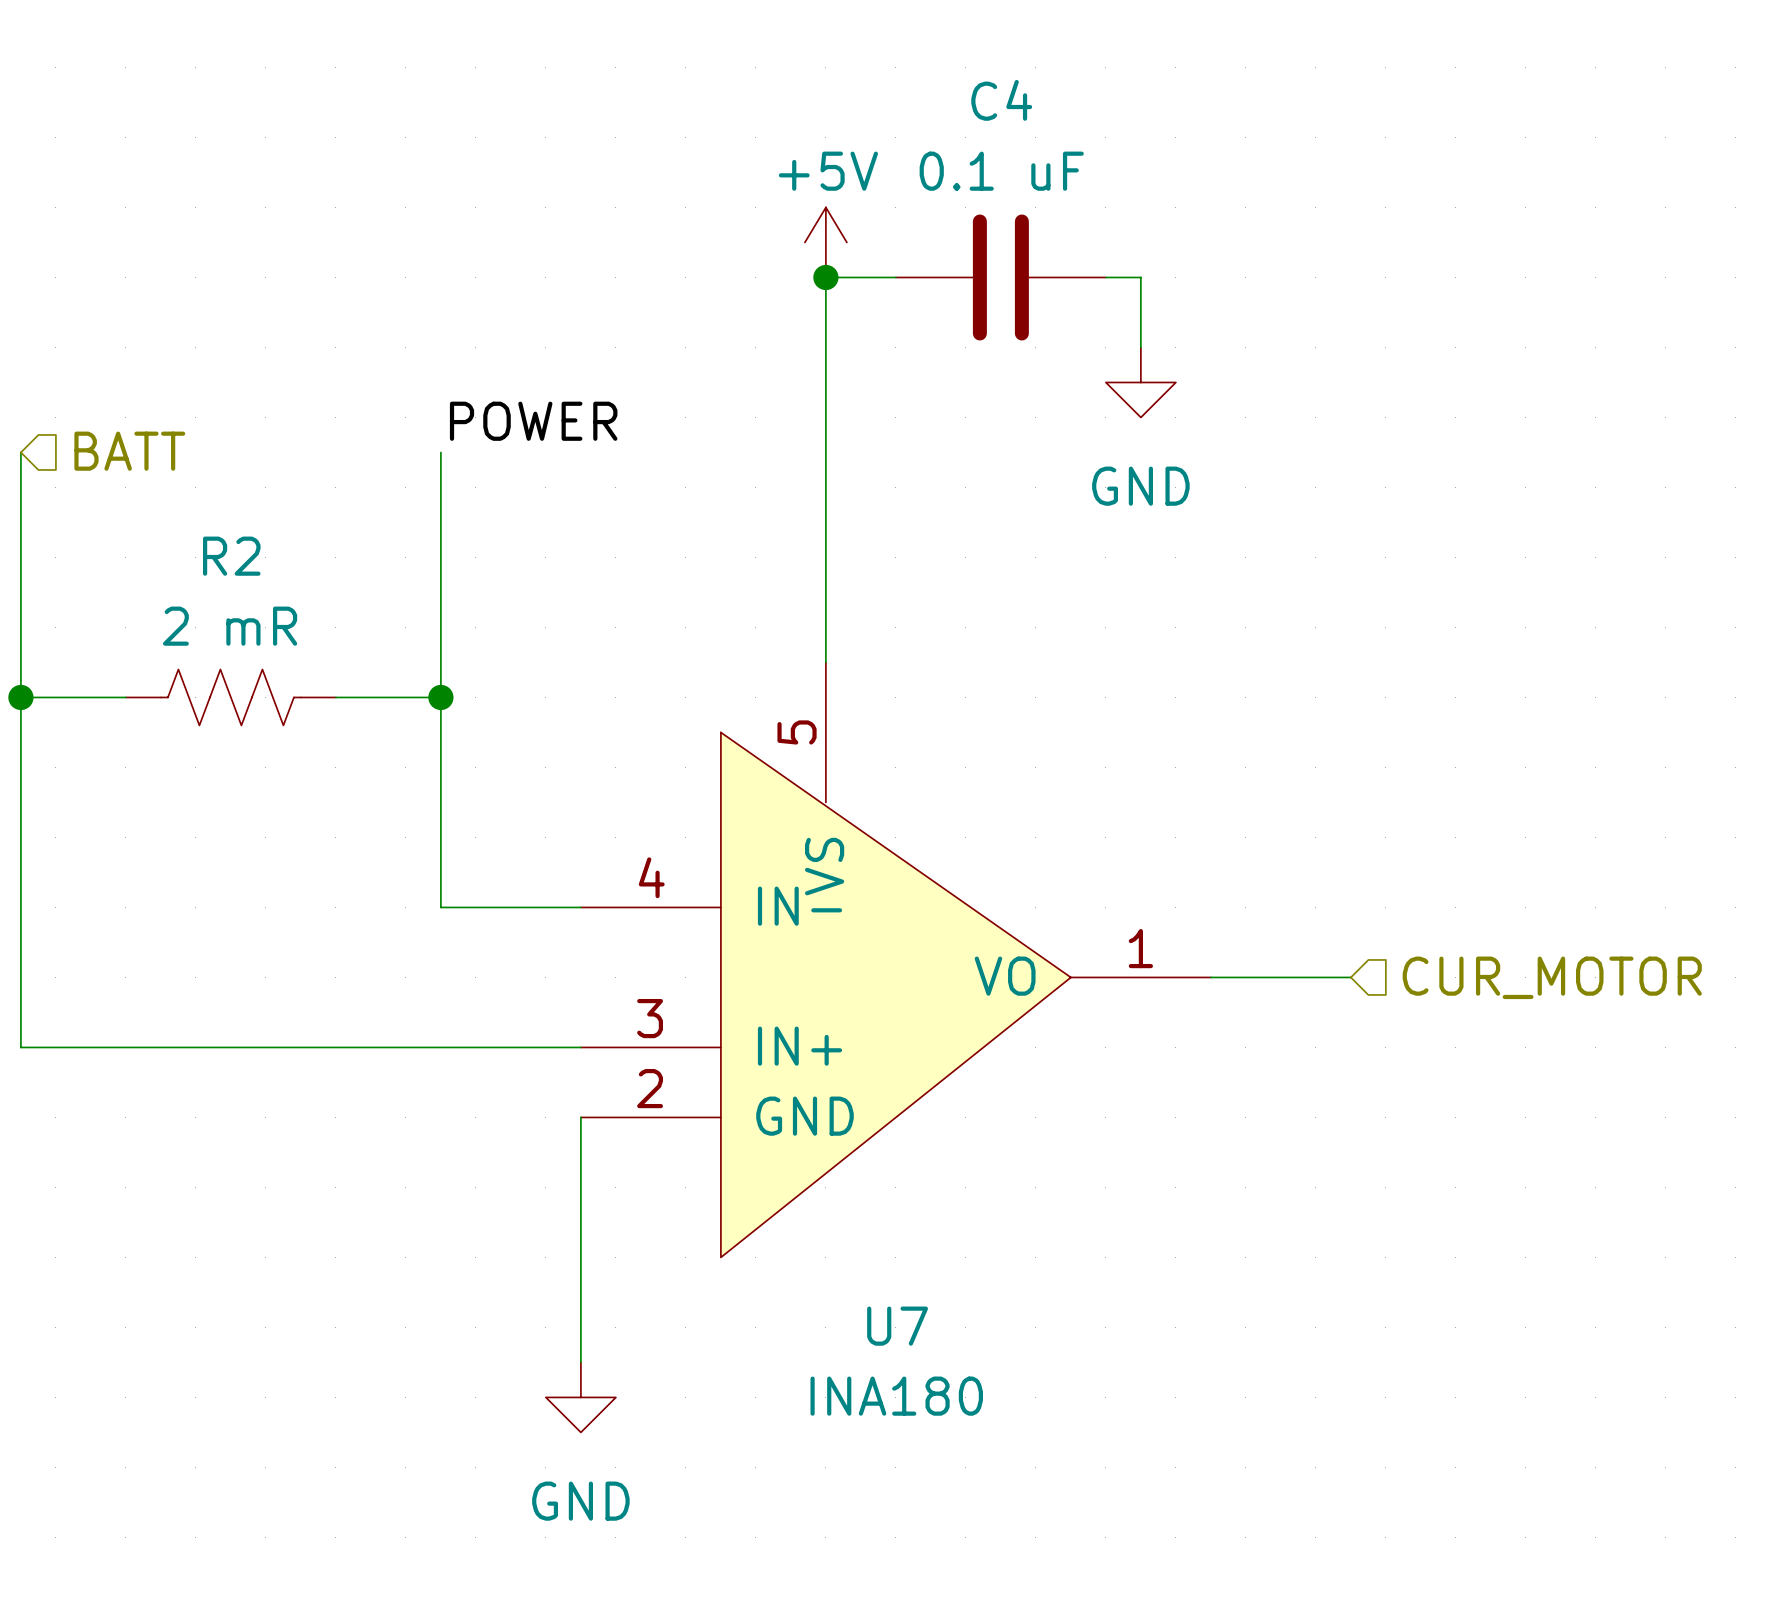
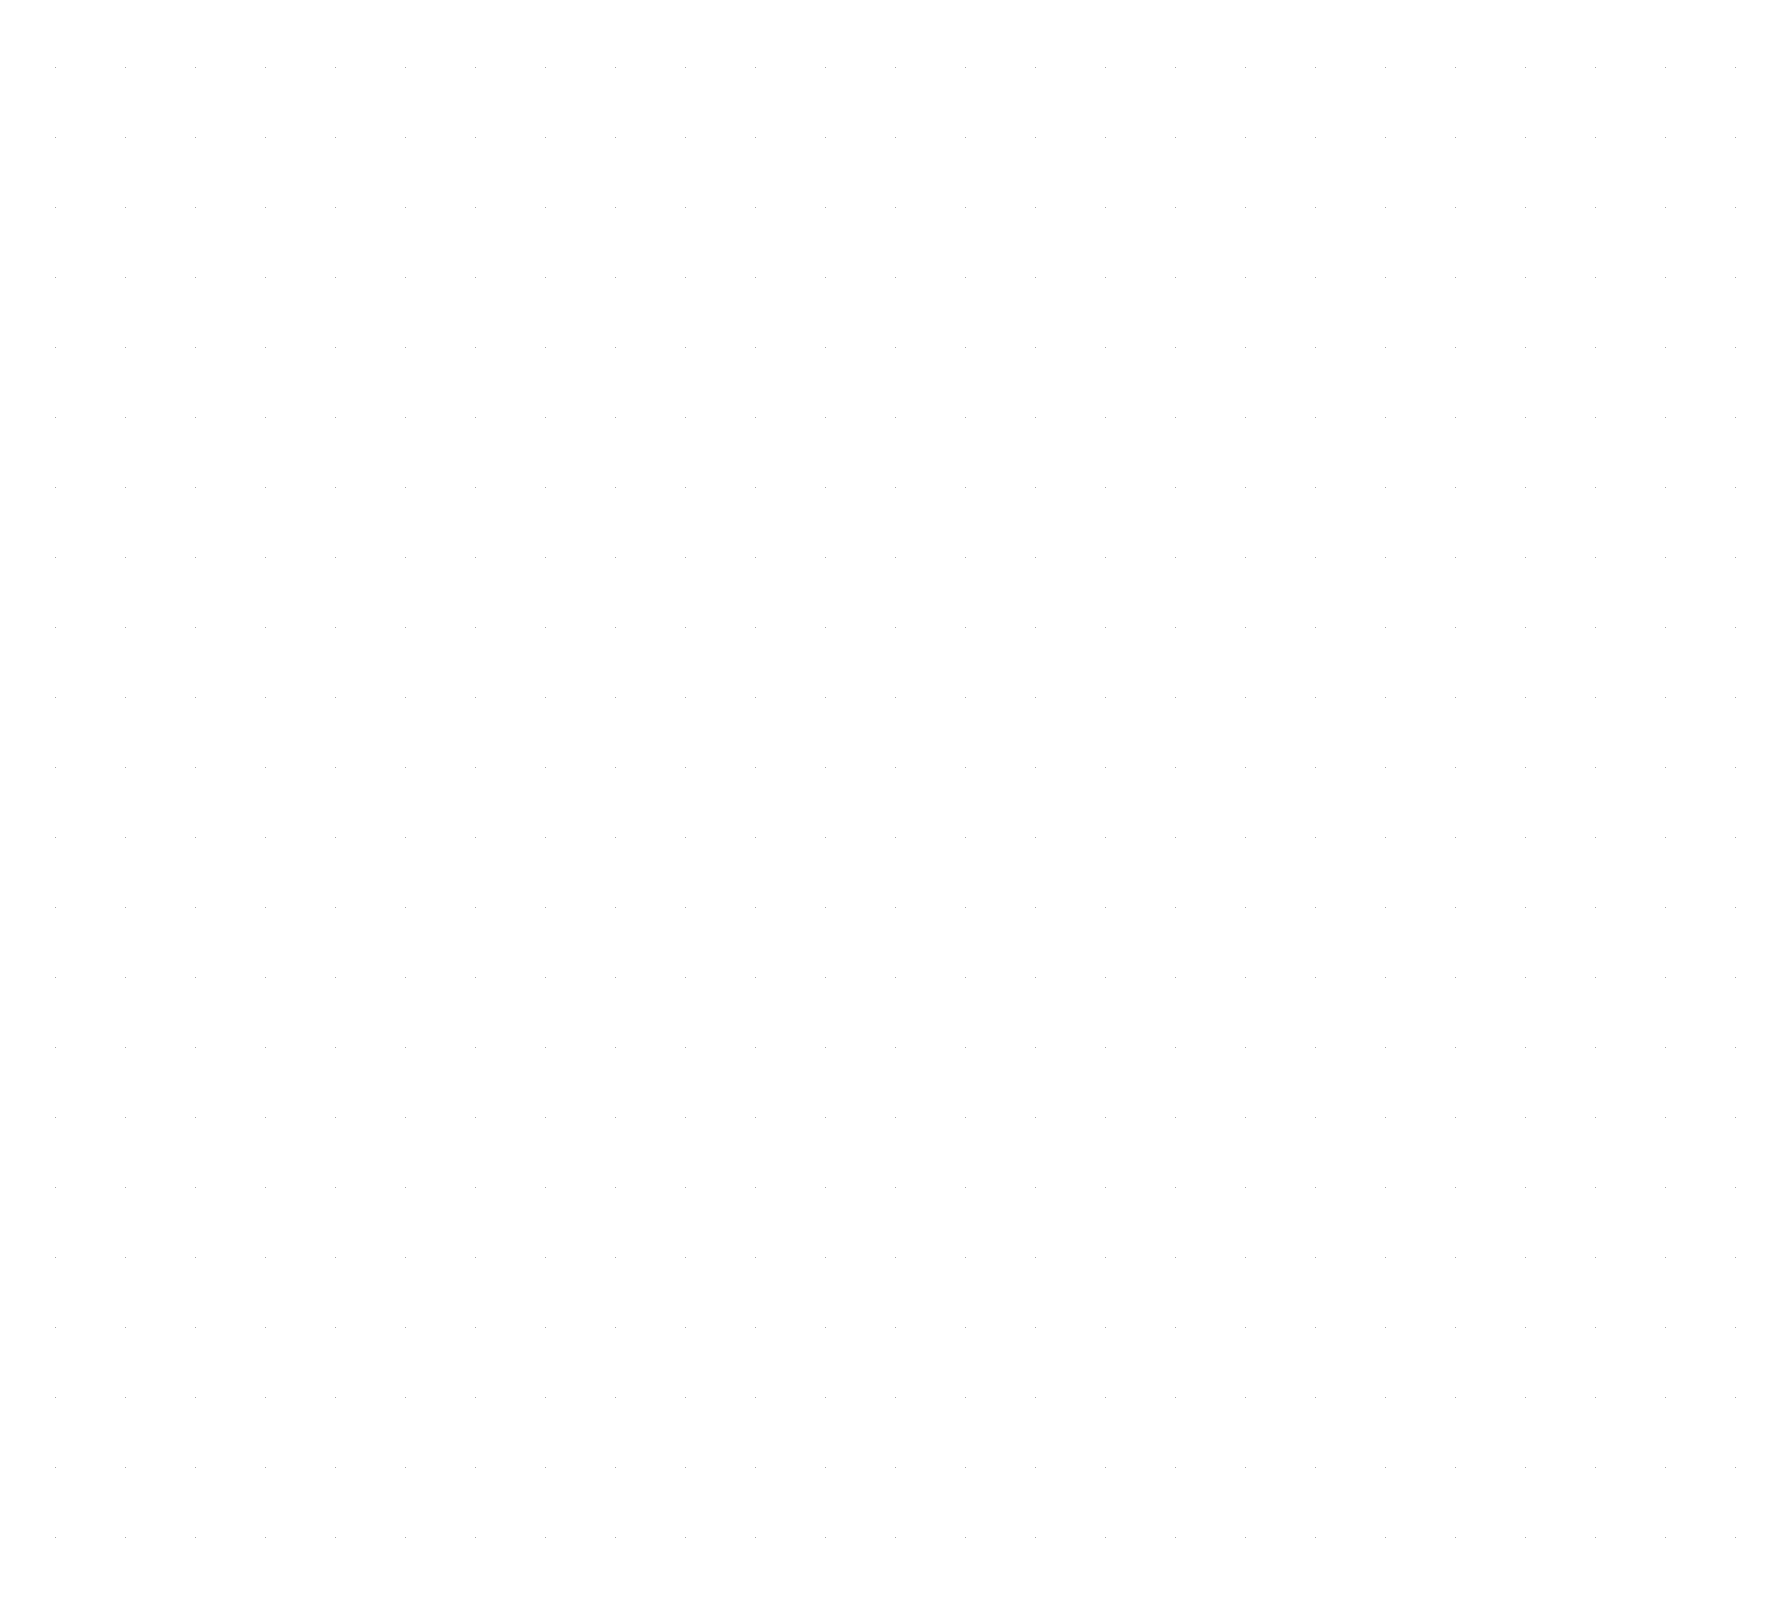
power symbol: +5V (825, 242) -> none
junction: (825, 277) -> none
wire: (895, 277) (825, 277) (825, 662) -> none
C4: 0.1 uF (1000, 277) -> none
wire: (1105, 277) (1140, 277) (1140, 347) -> none
power symbol: GND (1140, 382) -> none
label: POWER (533, 421) -> none
hierarchical label: BATT (129, 451) -> none
wire: (20, 452) (20, 1047) (580, 1047) -> none
wire: (440, 452) (440, 907) (580, 907) -> none
wire: (20, 697) (125, 697) -> none
junction: (20, 697) -> none
R2: 2 mR (230, 697) -> none
wire: (335, 697) (440, 697) -> none
junction: (440, 697) -> none
U7: INA180 (895, 959) -> none
wire: (1210, 977) (1350, 977) -> none
hierarchical label: CUR_MOTOR (1552, 977) -> none
wire: (580, 1117) (580, 1362) -> none
power symbol: GND (580, 1397) -> none

